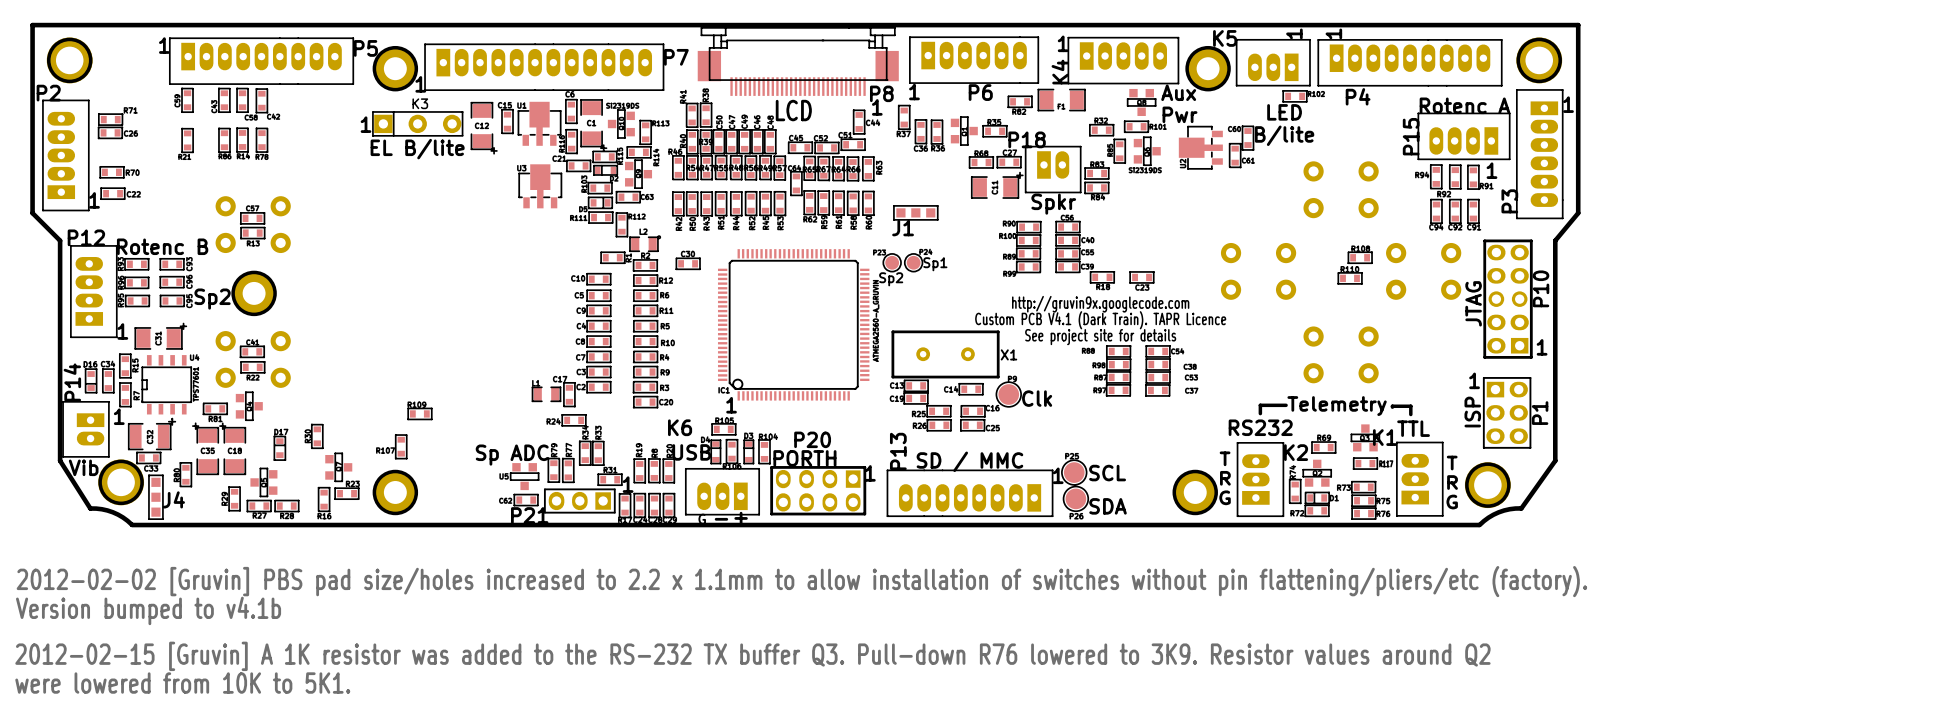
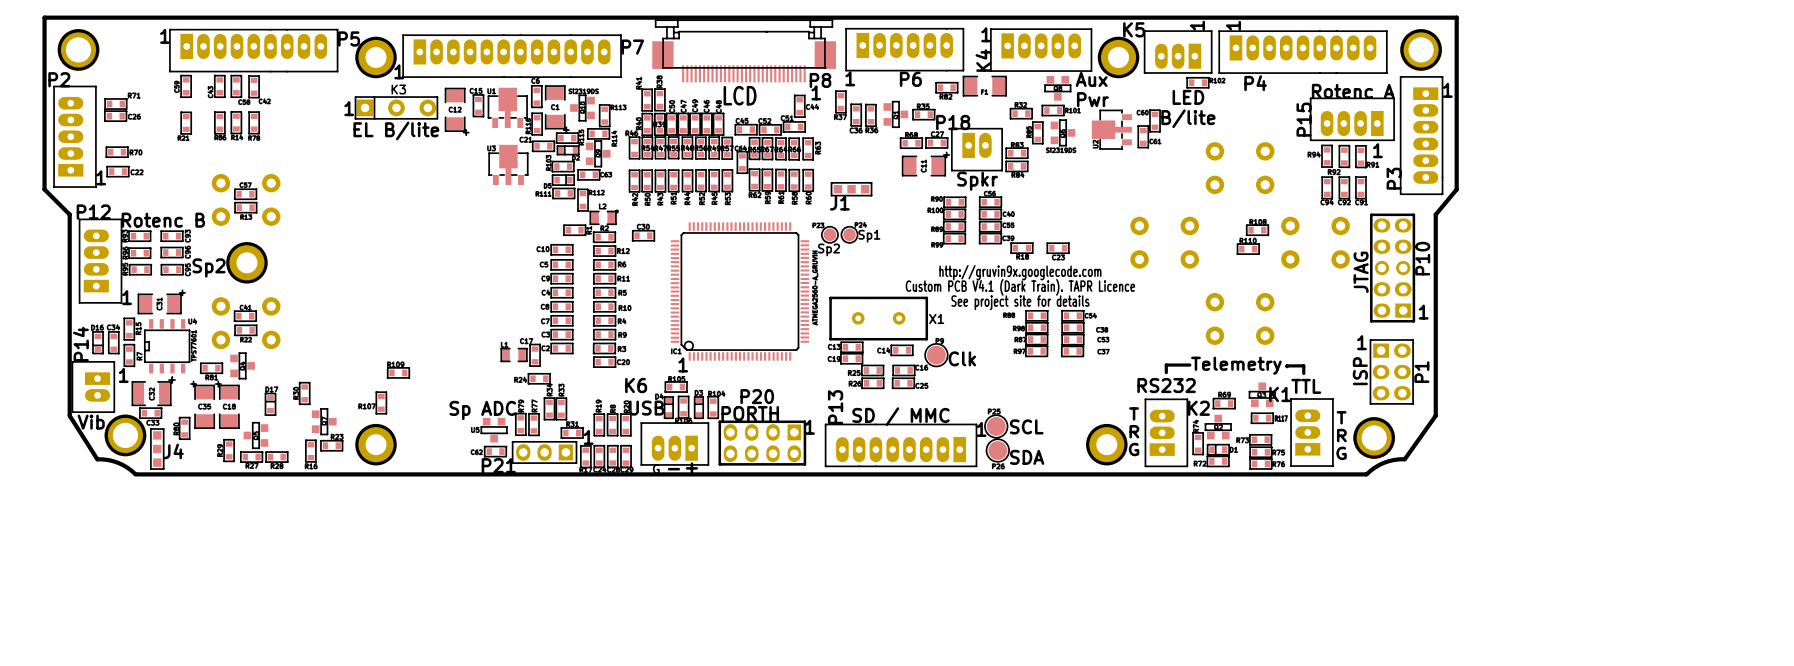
text: 2012-02-02 [Gruvin] PBS pad size/holes increased to 2.2 x 1.1mm to allow installation of switches without pin flattening/pliers/etc (factory). (801, 581) -> none
text: Version bumped to v4.1b (148, 610) -> none
text: 2012-02-15 [Gruvin] A 1K resistor was added to the RS-232 TX buffer Q3. Pull-down R76 lowered to 3K9. Resistor values around Q2 (752, 656) -> none
text: were lowered from 10K to 5K1. (182, 683) -> none

